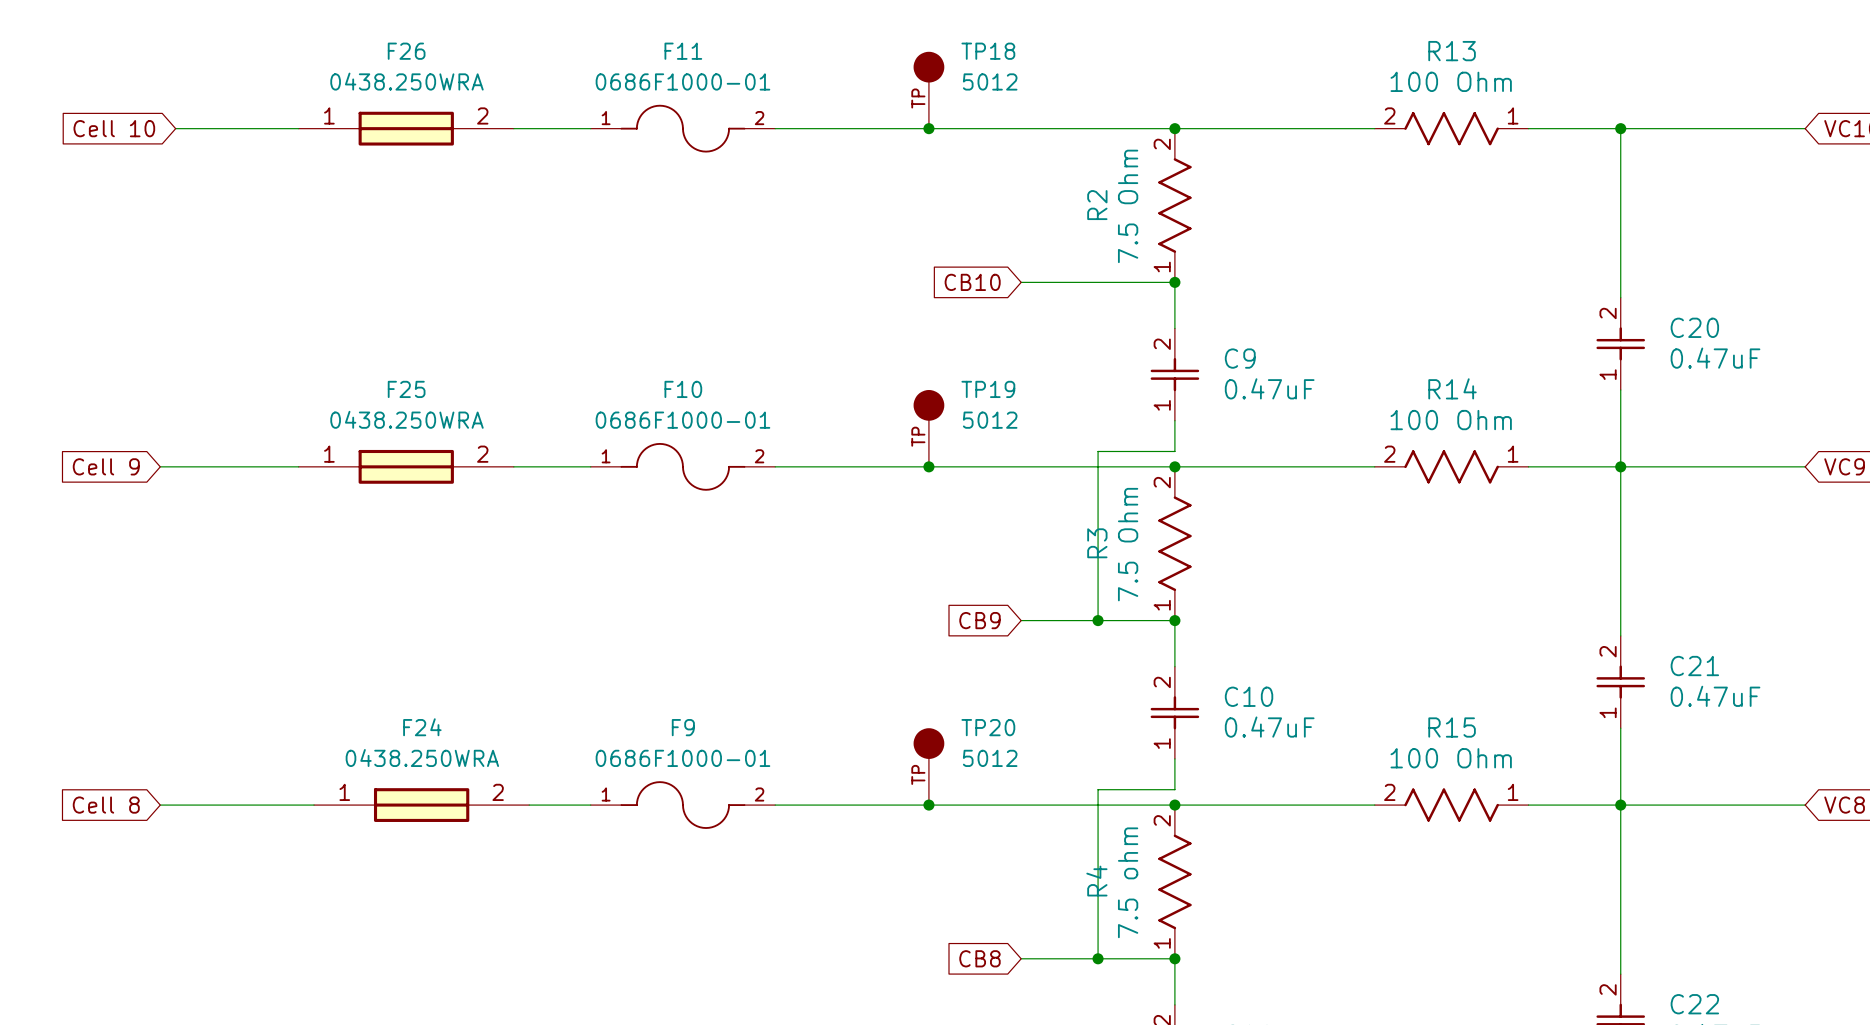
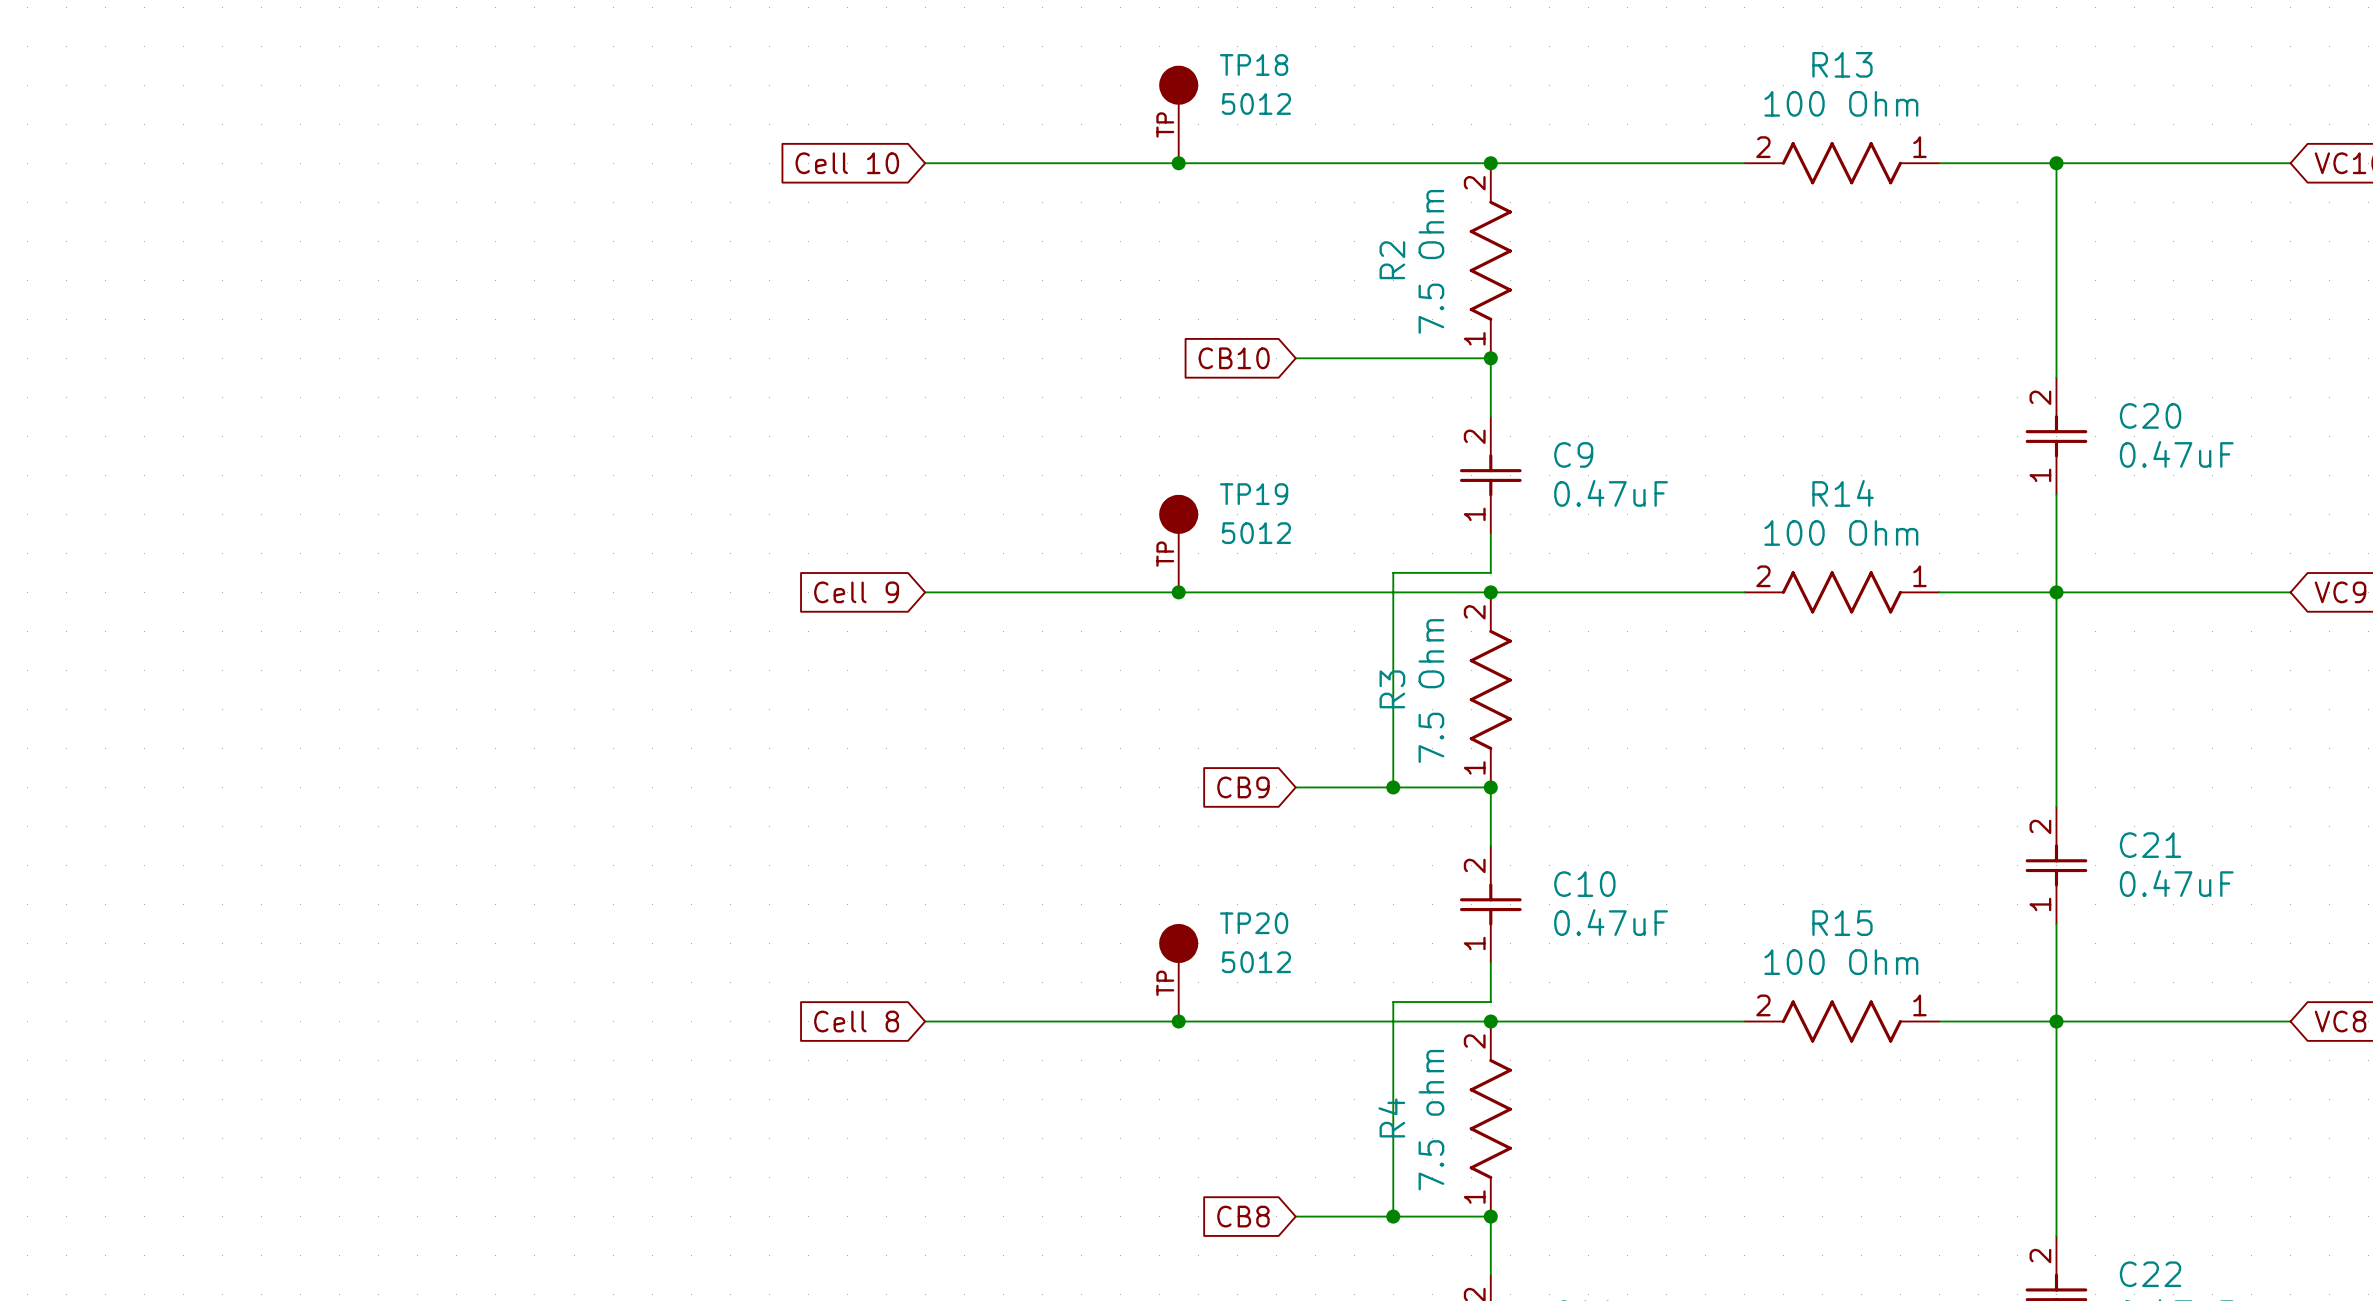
global label: Cell 10 (114, 128) -> none
wire: (175, 128) (298, 128) -> none
F26: 0438.250WRA (406, 128) -> none
wire: (513, 128) (590, 128) -> none
global label: none -> Cell 10 (847, 163)
F11: 0686F1000-01 (682, 128) -> none
global label: Cell 9 (106, 466) -> none
wire: (160, 466) (298, 466) -> none
F25: 0438.250WRA (406, 466) -> none
wire: (513, 466) (590, 466) -> none
global label: none -> Cell 9 (856, 592)
F10: 0686F1000-01 (682, 466) -> none
global label: Cell 8 (106, 805) -> none
wire: (160, 805) (314, 805) -> none
F24: 0438.250WRA (421, 805) -> none
wire: (529, 805) (590, 805) -> none
global label: none -> Cell 8 (856, 1021)
F9: 0686F1000-01 (682, 805) -> none

